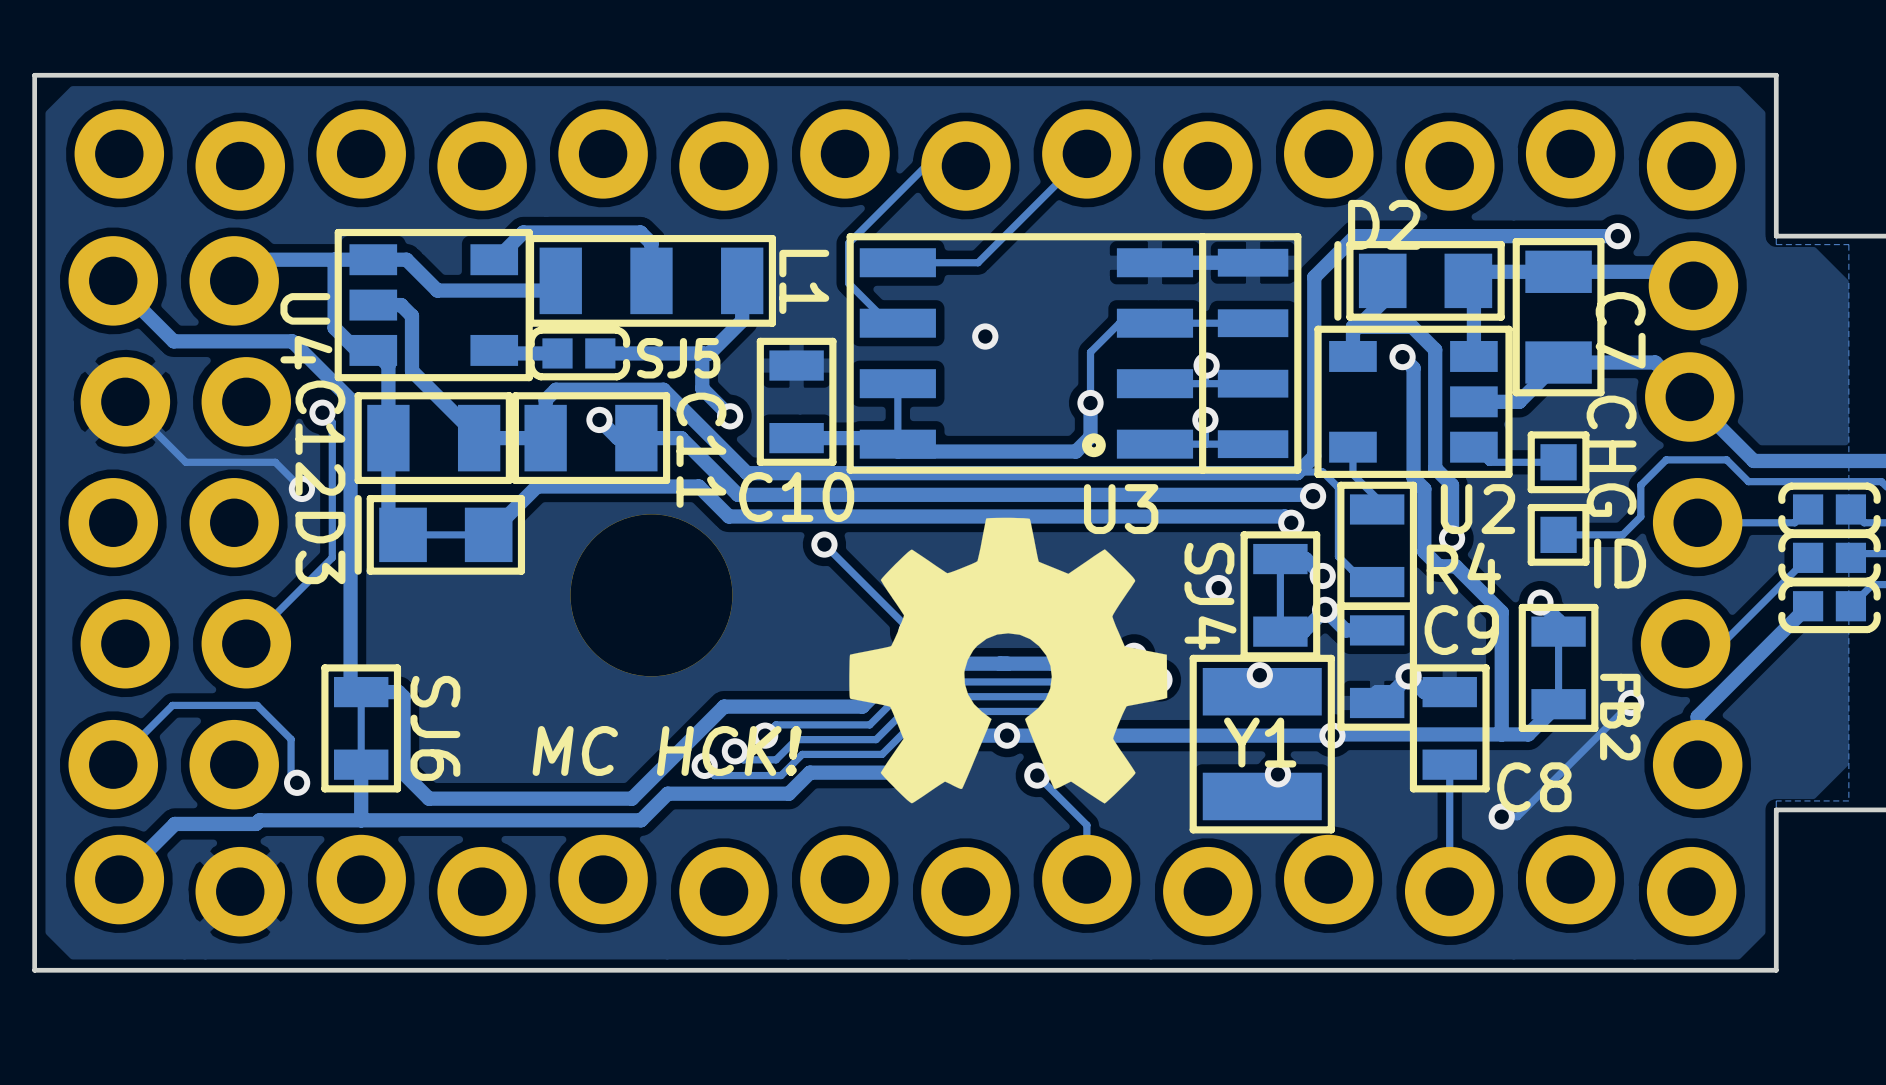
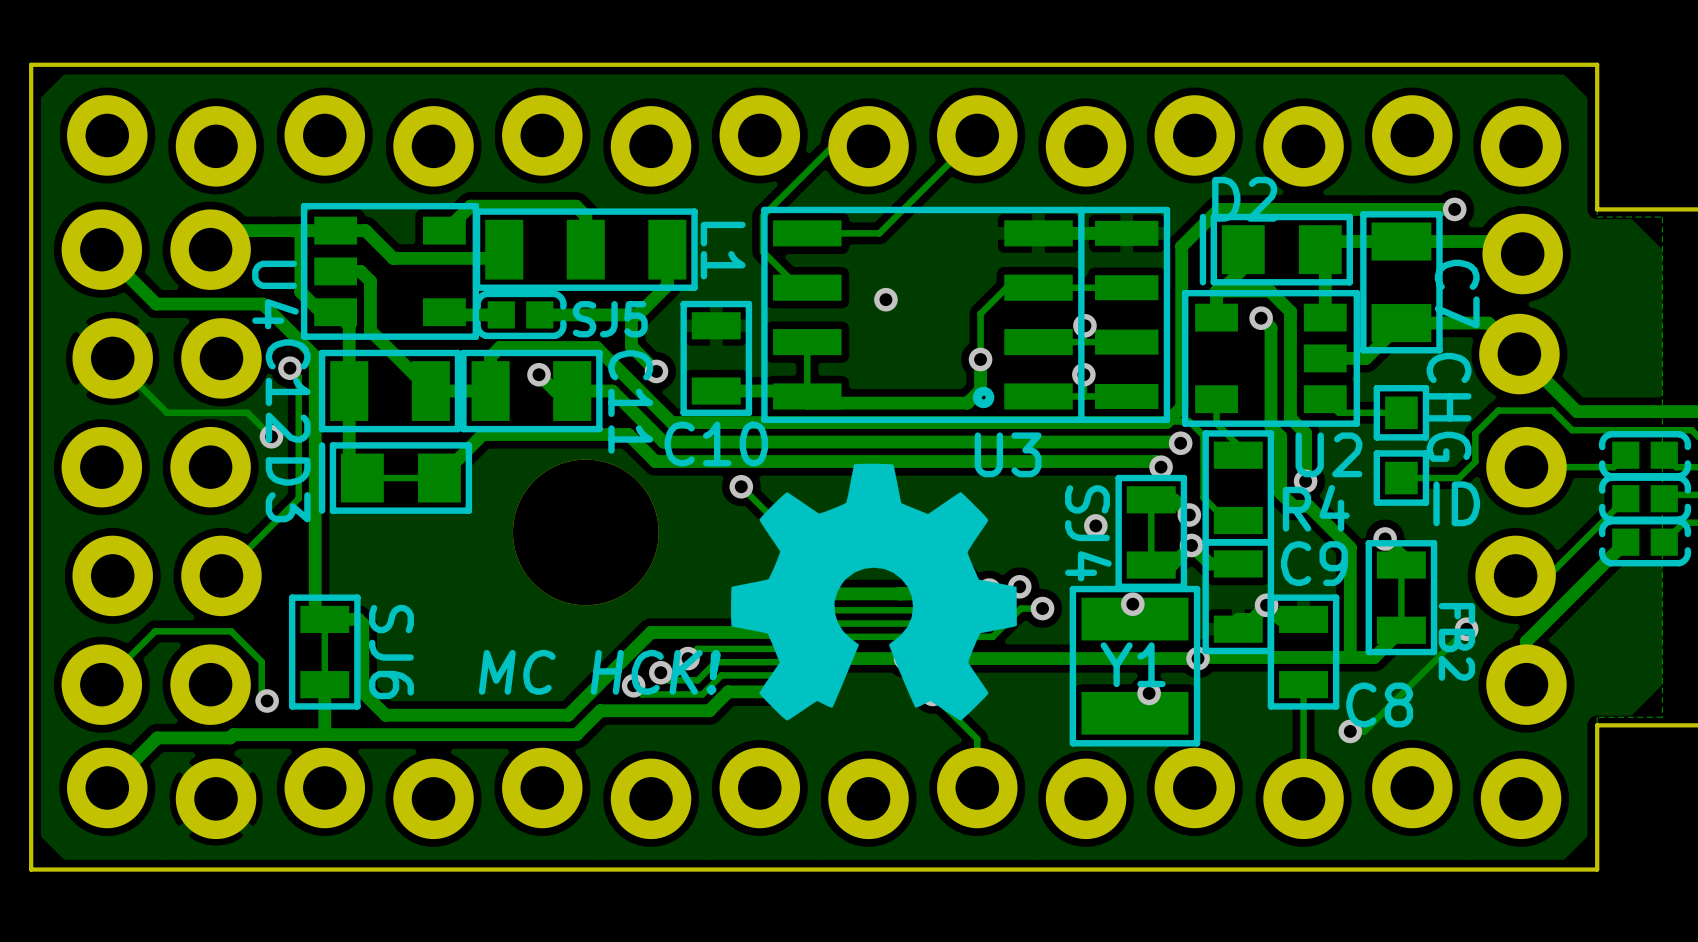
drawing position: (1008, 660) -> (873, 592)

